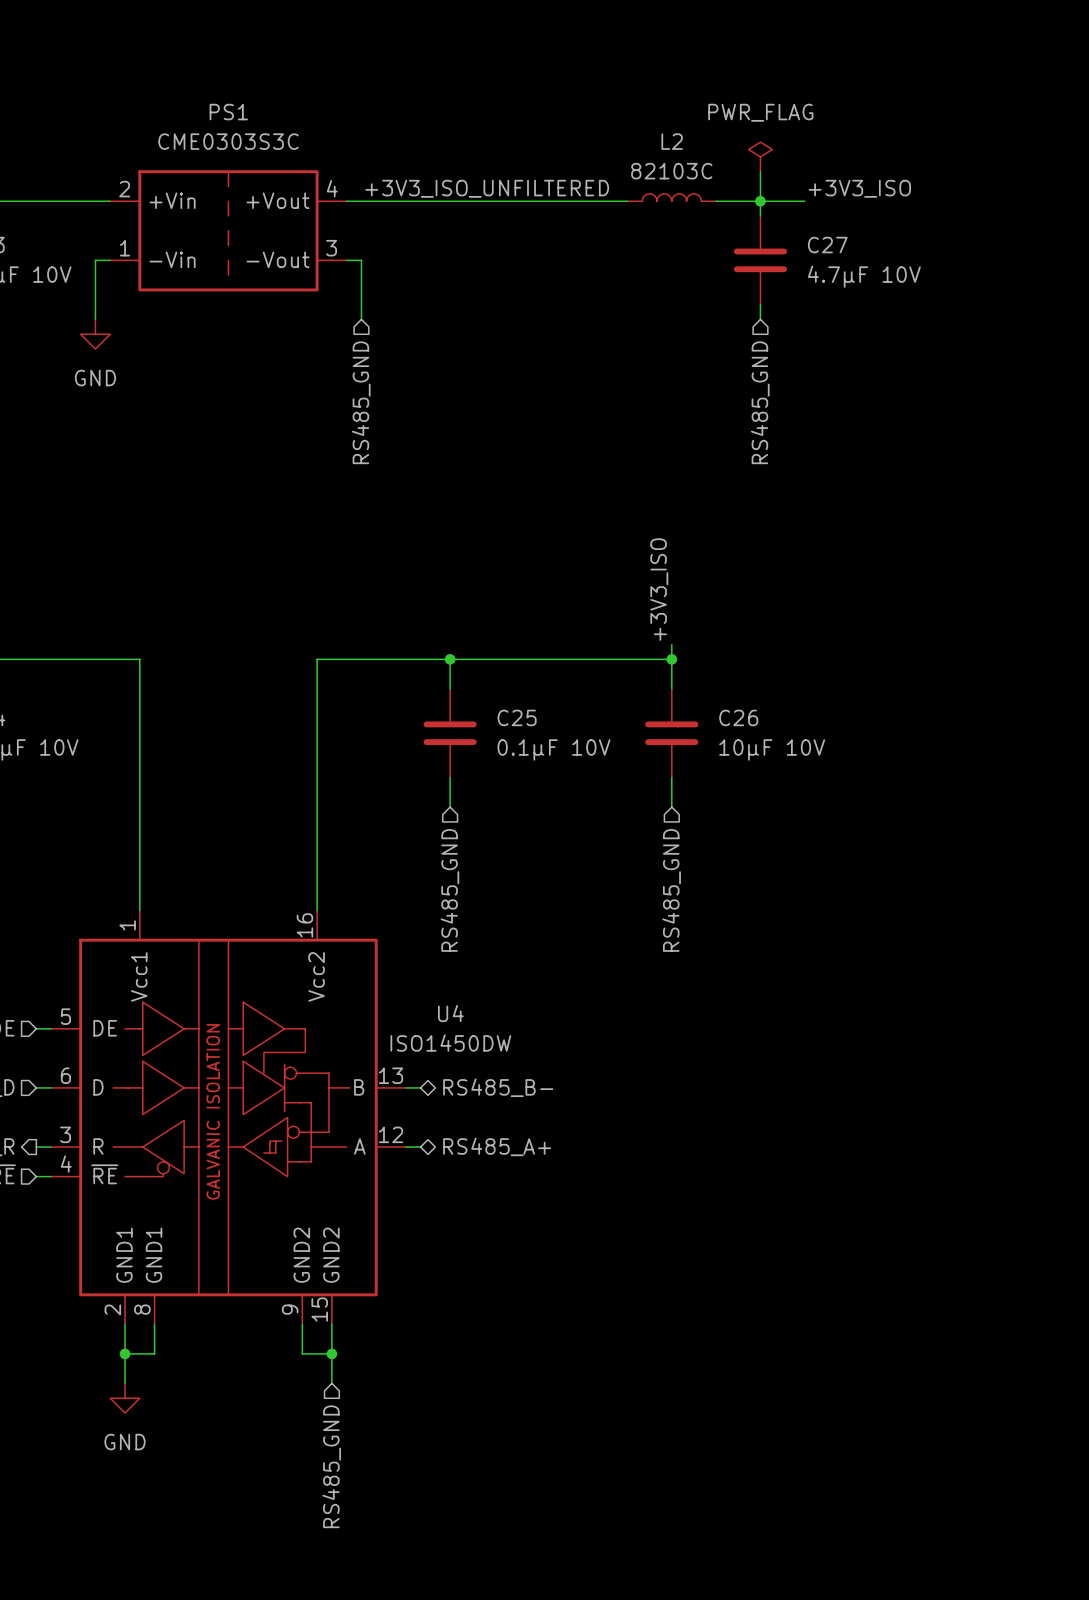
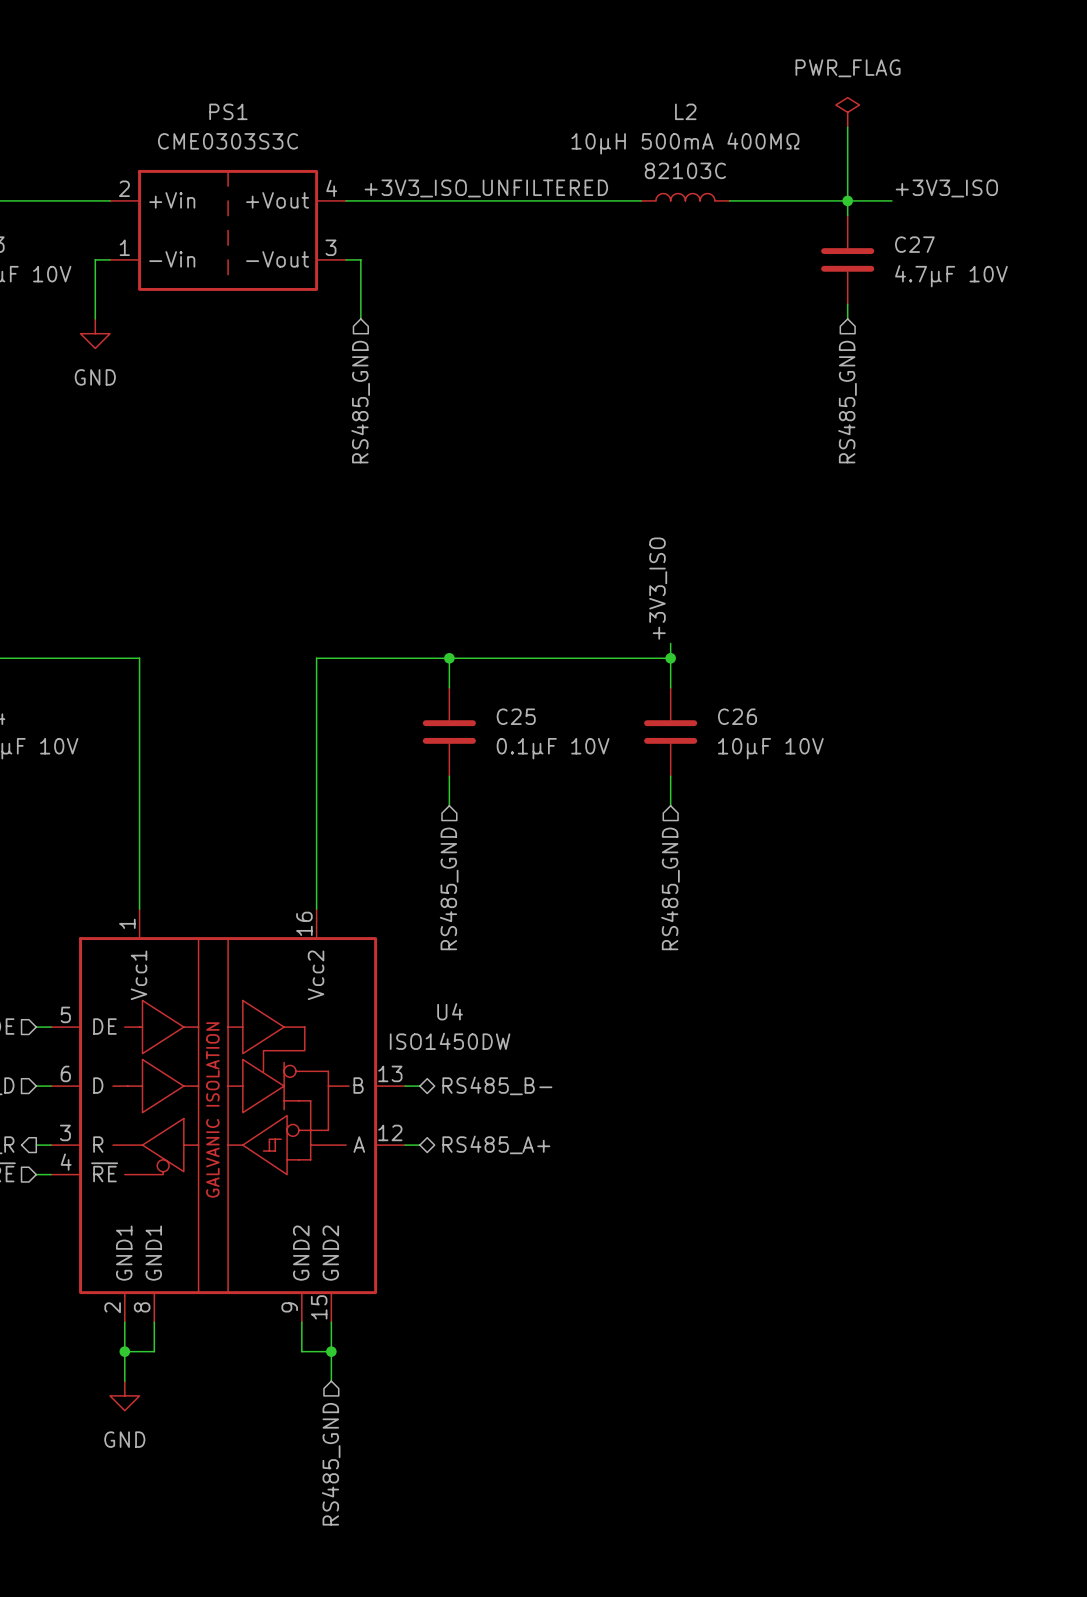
wire: none -> (847, 127) (847, 215)
L2 name position: L2 (672, 141) -> L2 (685, 111)
power symbol position: PWR_FLAG (760, 156) -> PWR_FLAG (847, 112)
L2 value: 82103C (671, 171) -> 10µH 500mA 400MΩ (685, 143)
L2 text: none -> 82103C (685, 170)
wire: (760, 171) (760, 216) -> none
label position: +3V3_ISO (859, 188) -> +3V3_ISO (946, 188)
L2 position: (671, 197) -> (685, 197)
junction: (760, 201) -> none
wire: none -> (803, 200) (891, 200)
junction: none -> (847, 200)
C27 position: (760, 260) -> (847, 259)
wire: (760, 304) (760, 319) -> (847, 304) (847, 318)
hierarchical label position: RS485_GND (760, 402) -> RS485_GND (847, 402)

